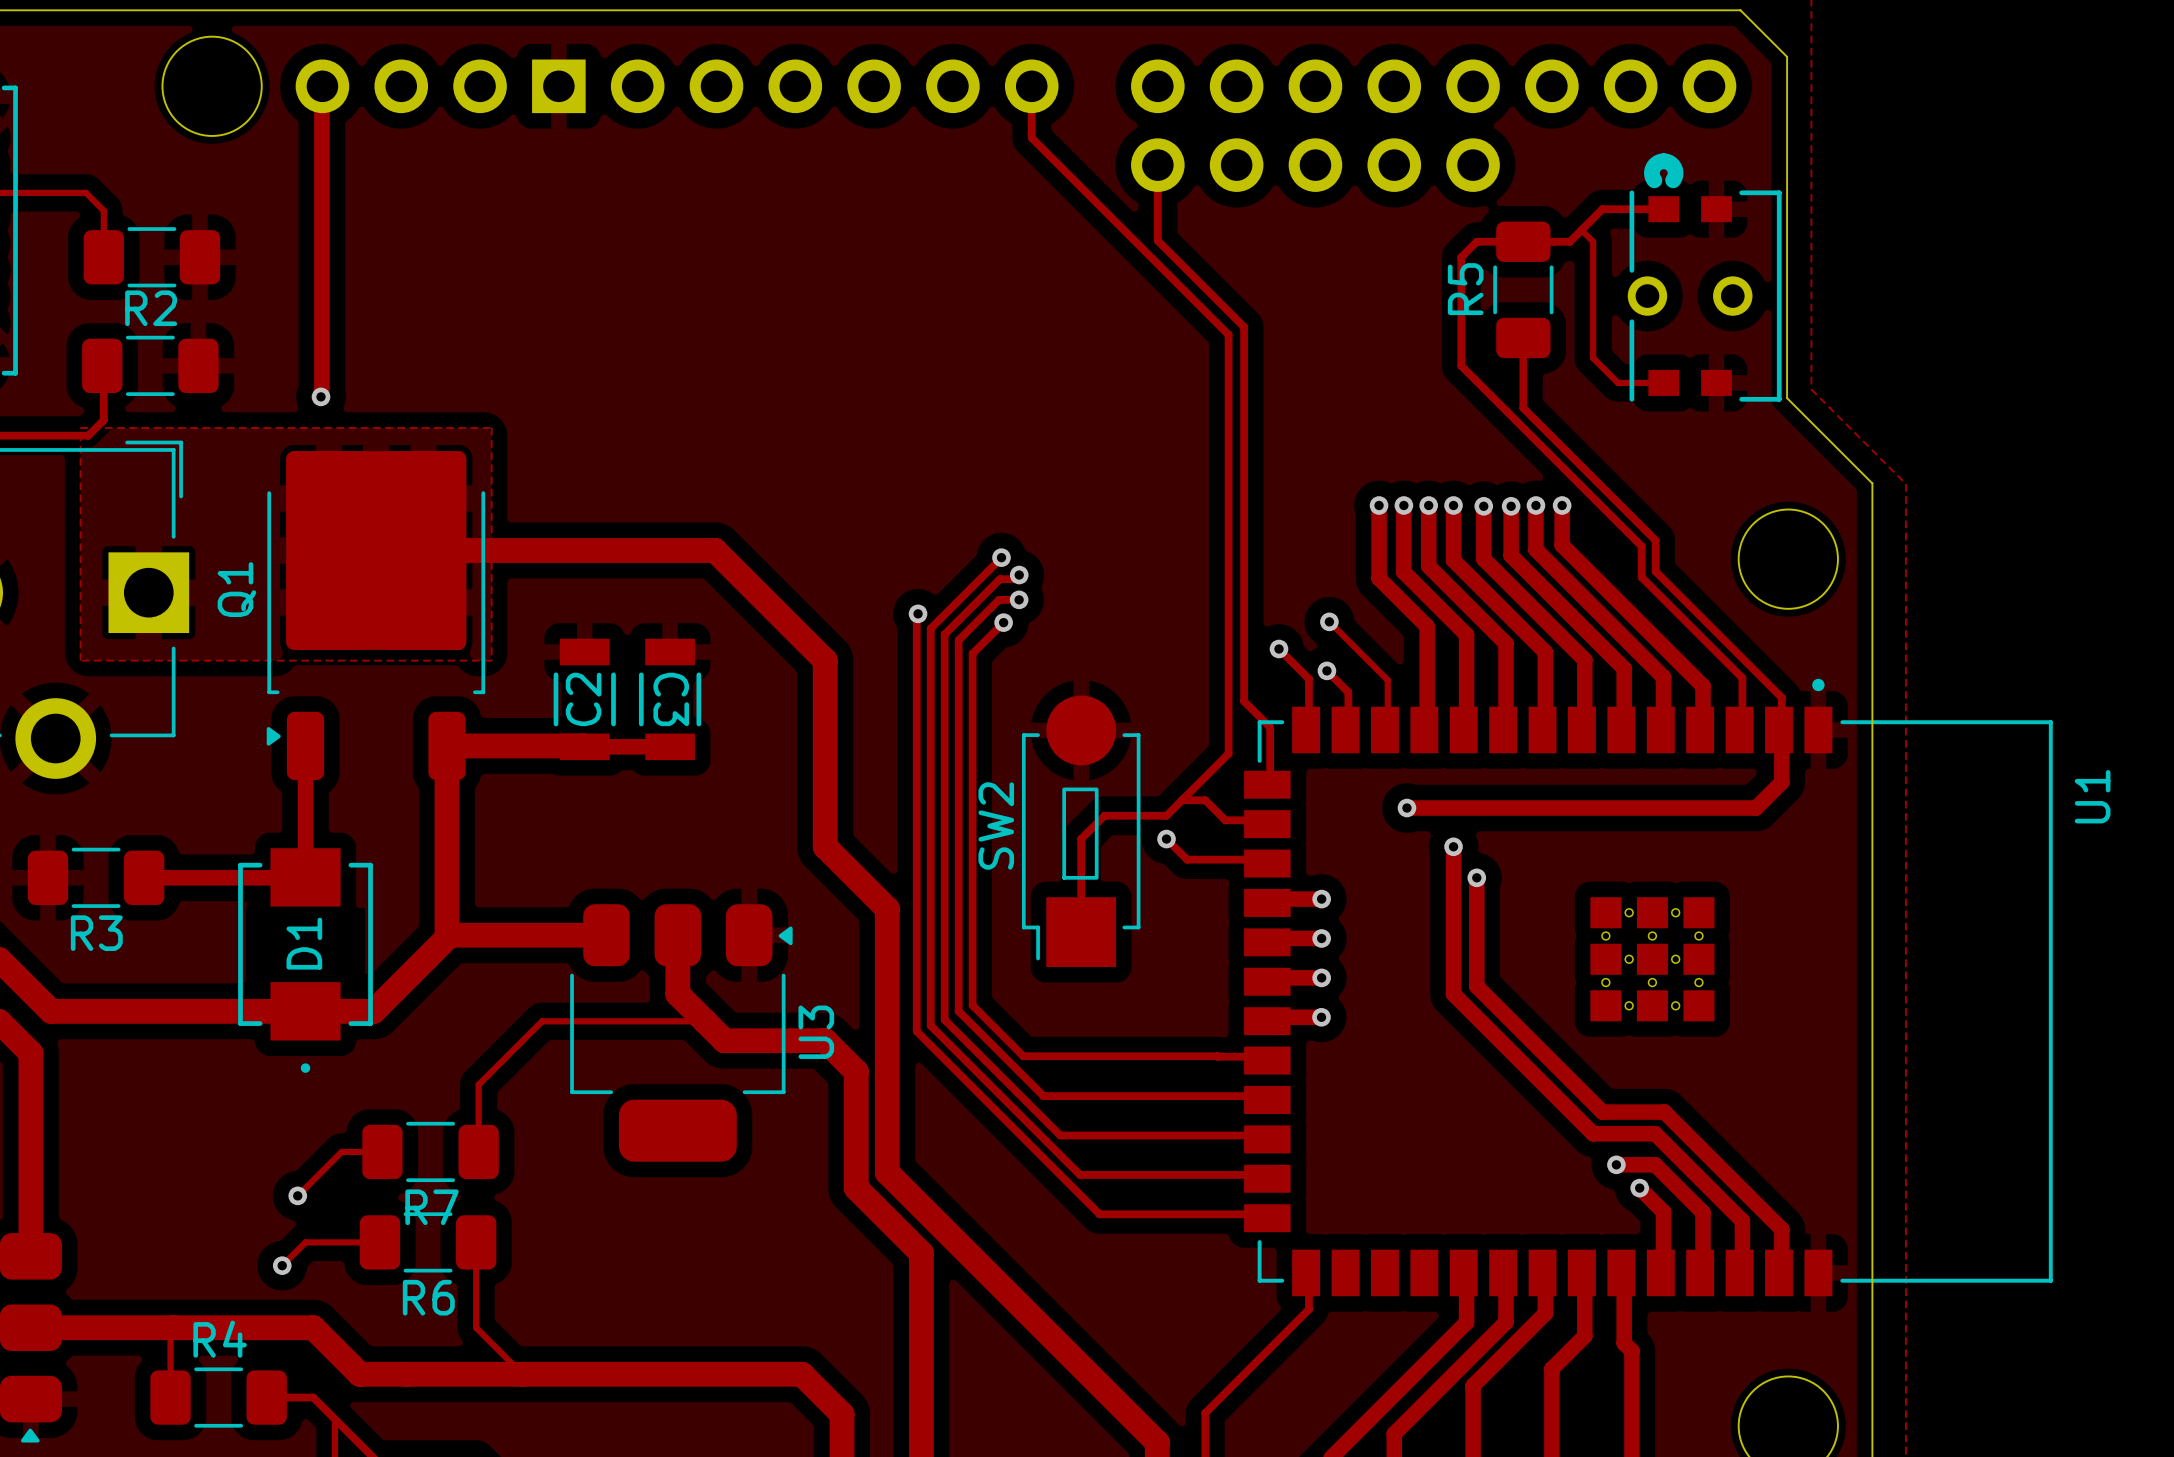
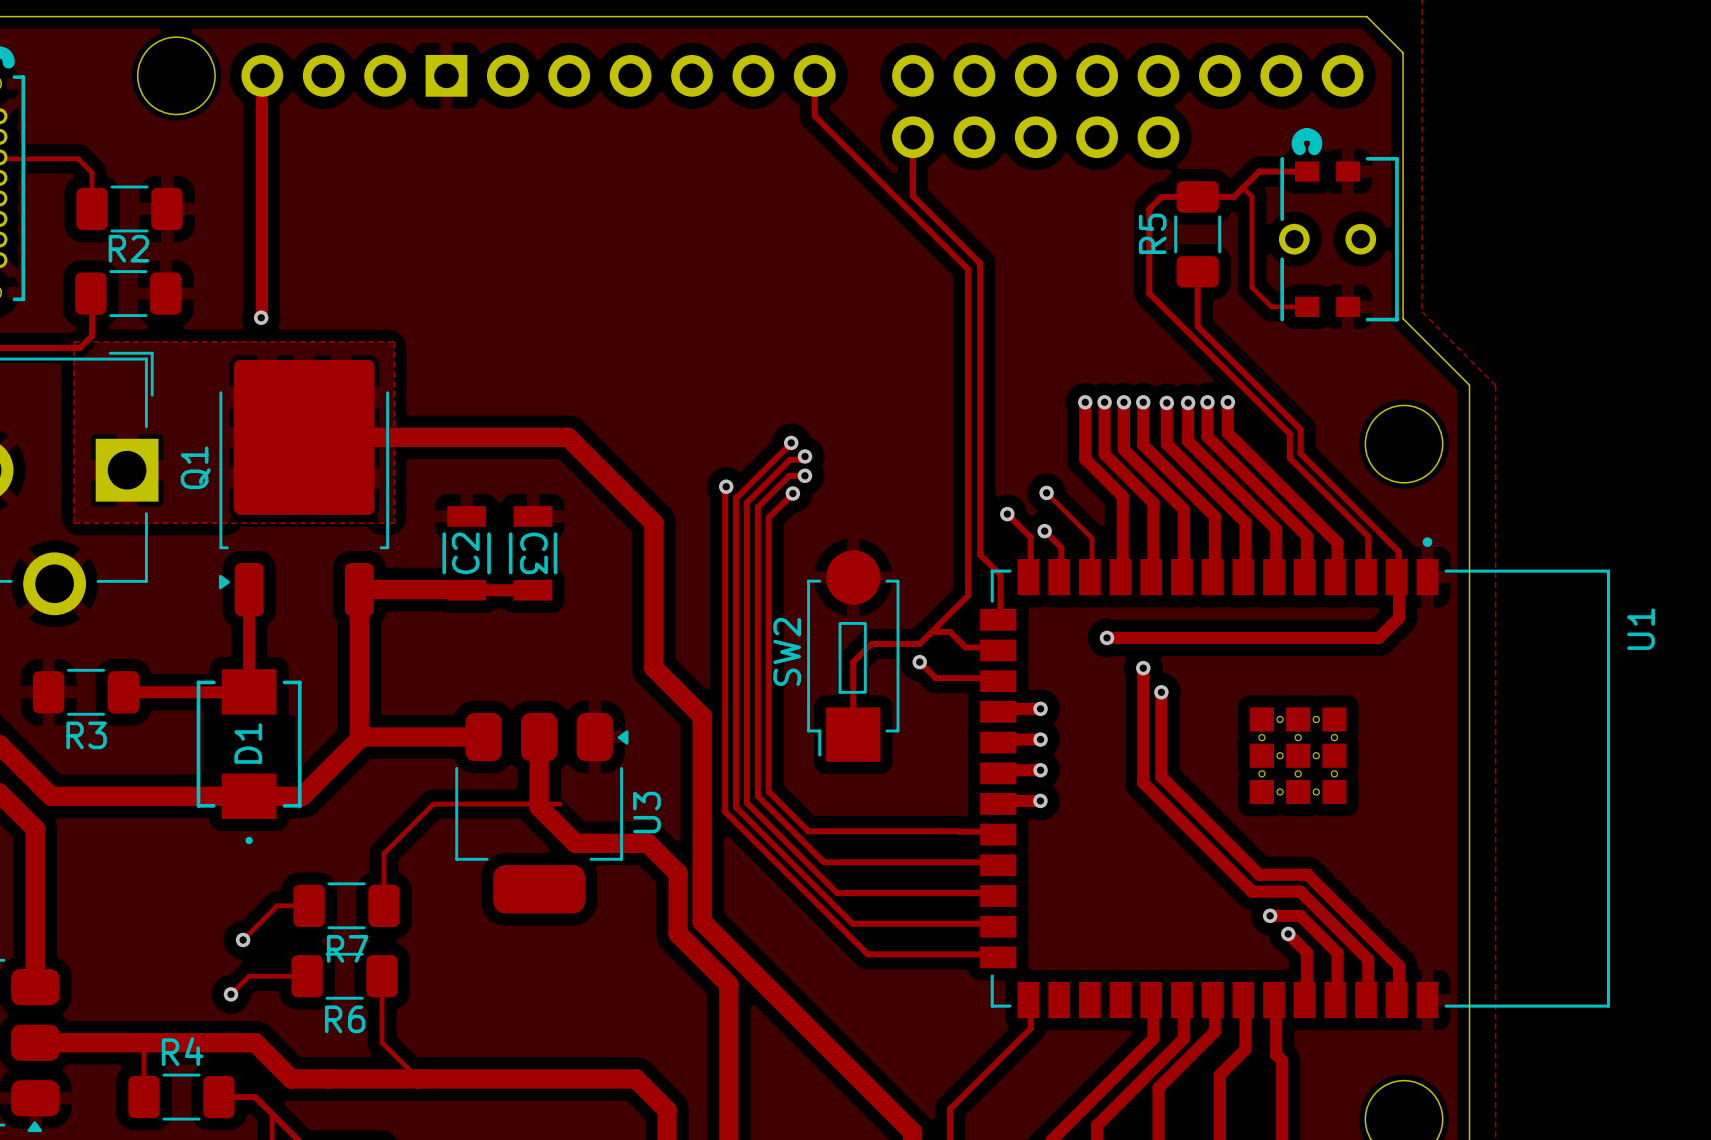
track: (677, 994) (724, 1040) (825, 1040) (856, 1071) (856, 1110) -> (539, 782) (539, 807) (575, 843) (647, 843) (678, 873)

